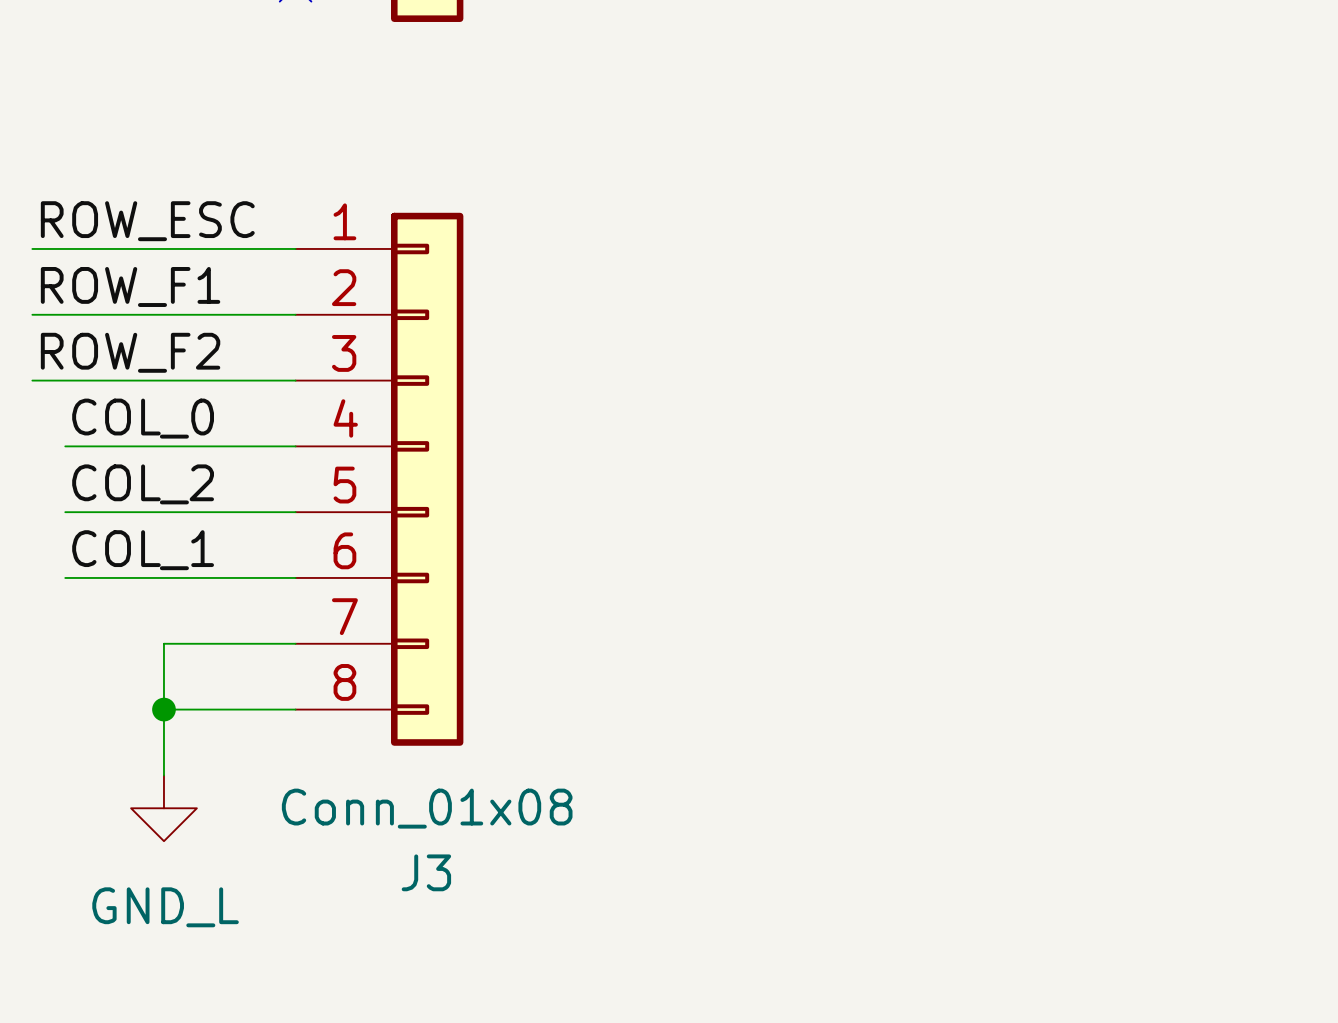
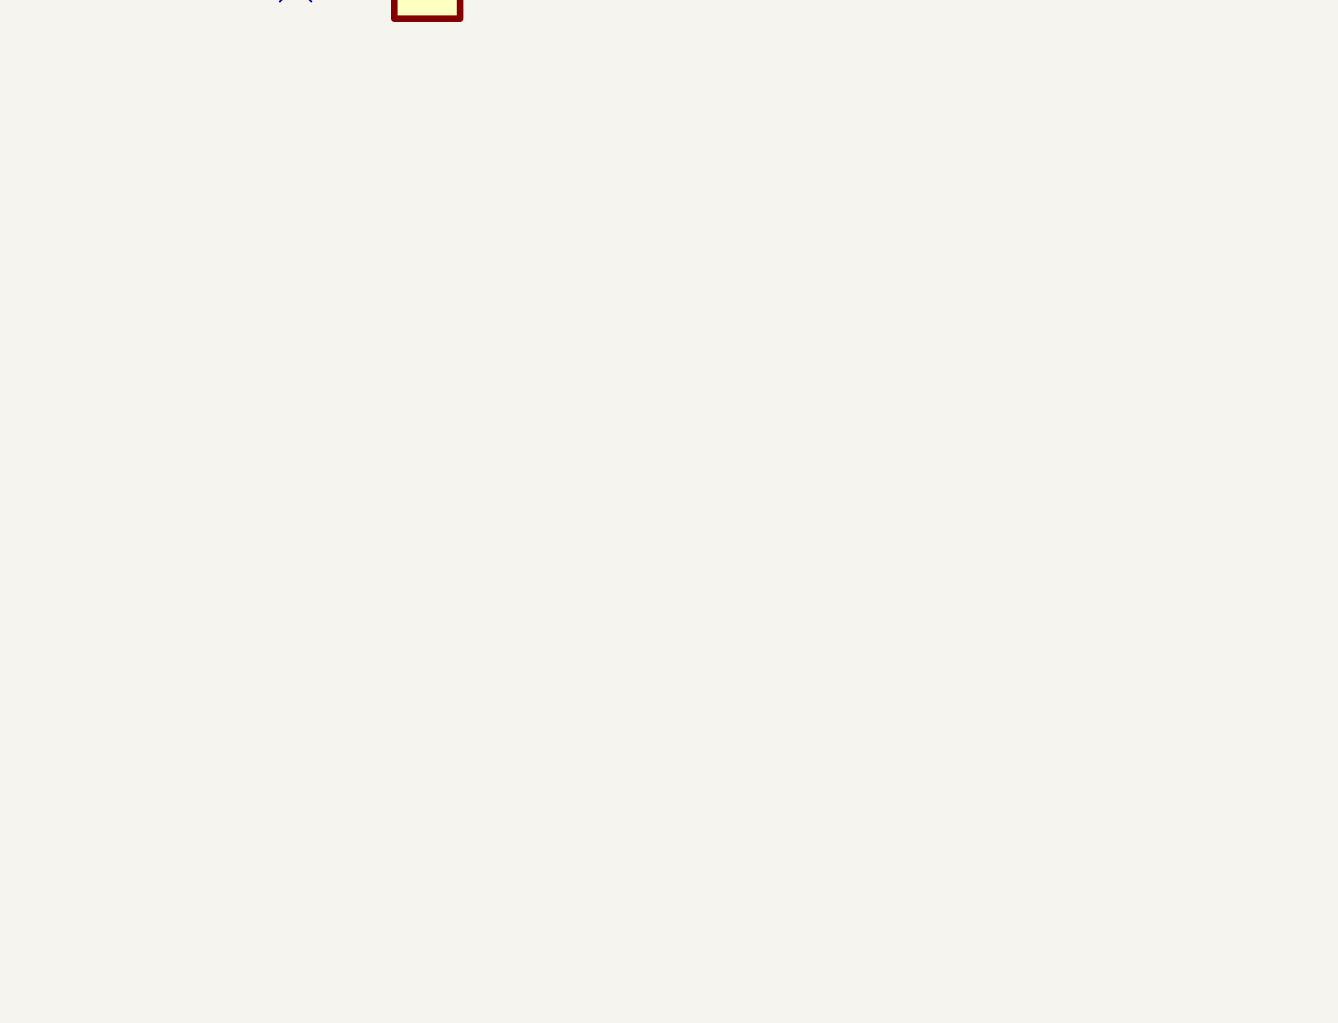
label: ROW_ESC (147, 221) -> none
wire: (32, 248) (295, 248) -> none
label: ROW_F1 (130, 286) -> none
wire: (32, 314) (295, 314) -> none
label: ROW_F2 (130, 352) -> none
wire: (32, 380) (295, 380) -> none
label: COL_0 (143, 418) -> none
wire: (65, 446) (295, 446) -> none
J3: Conn_01x08 (379, 479) -> none
label: COL_2 (143, 484) -> none
wire: (65, 512) (295, 512) -> none
label: COL_1 (143, 550) -> none
wire: (65, 577) (295, 577) -> none
wire: (295, 643) (163, 643) (163, 775) -> none
wire: (163, 709) (295, 709) -> none
junction: (163, 709) -> none
power symbol: GND_L (163, 808) -> none

